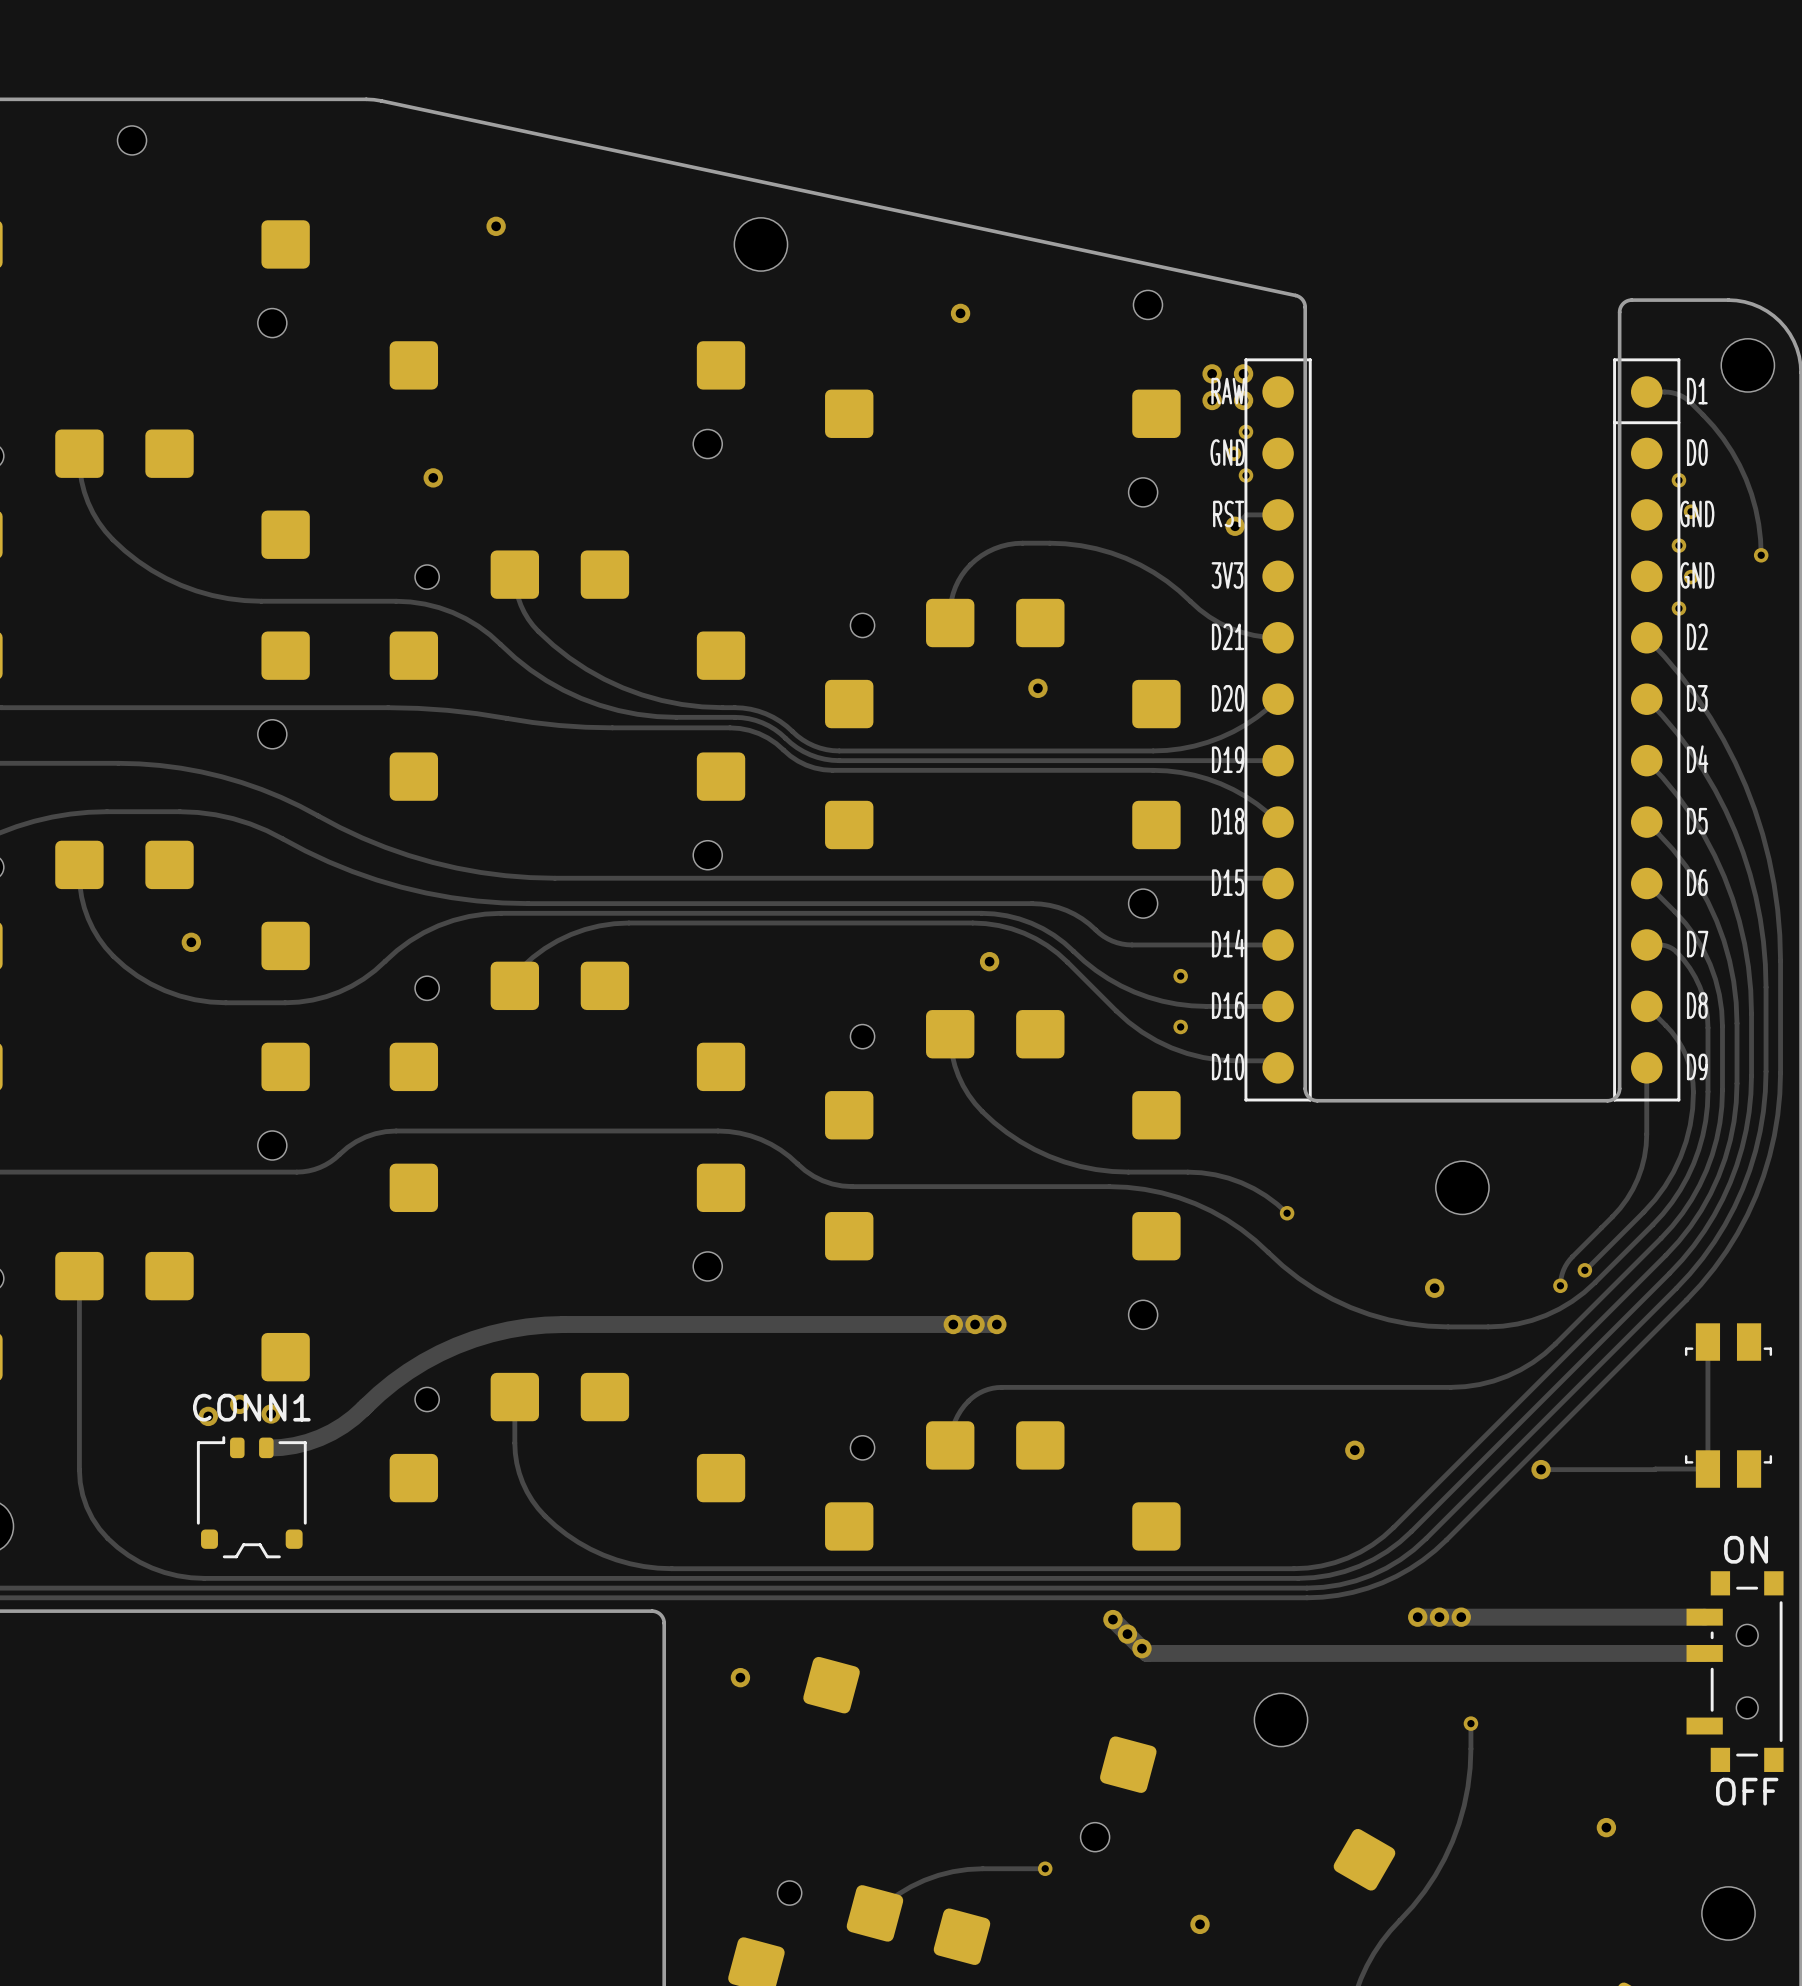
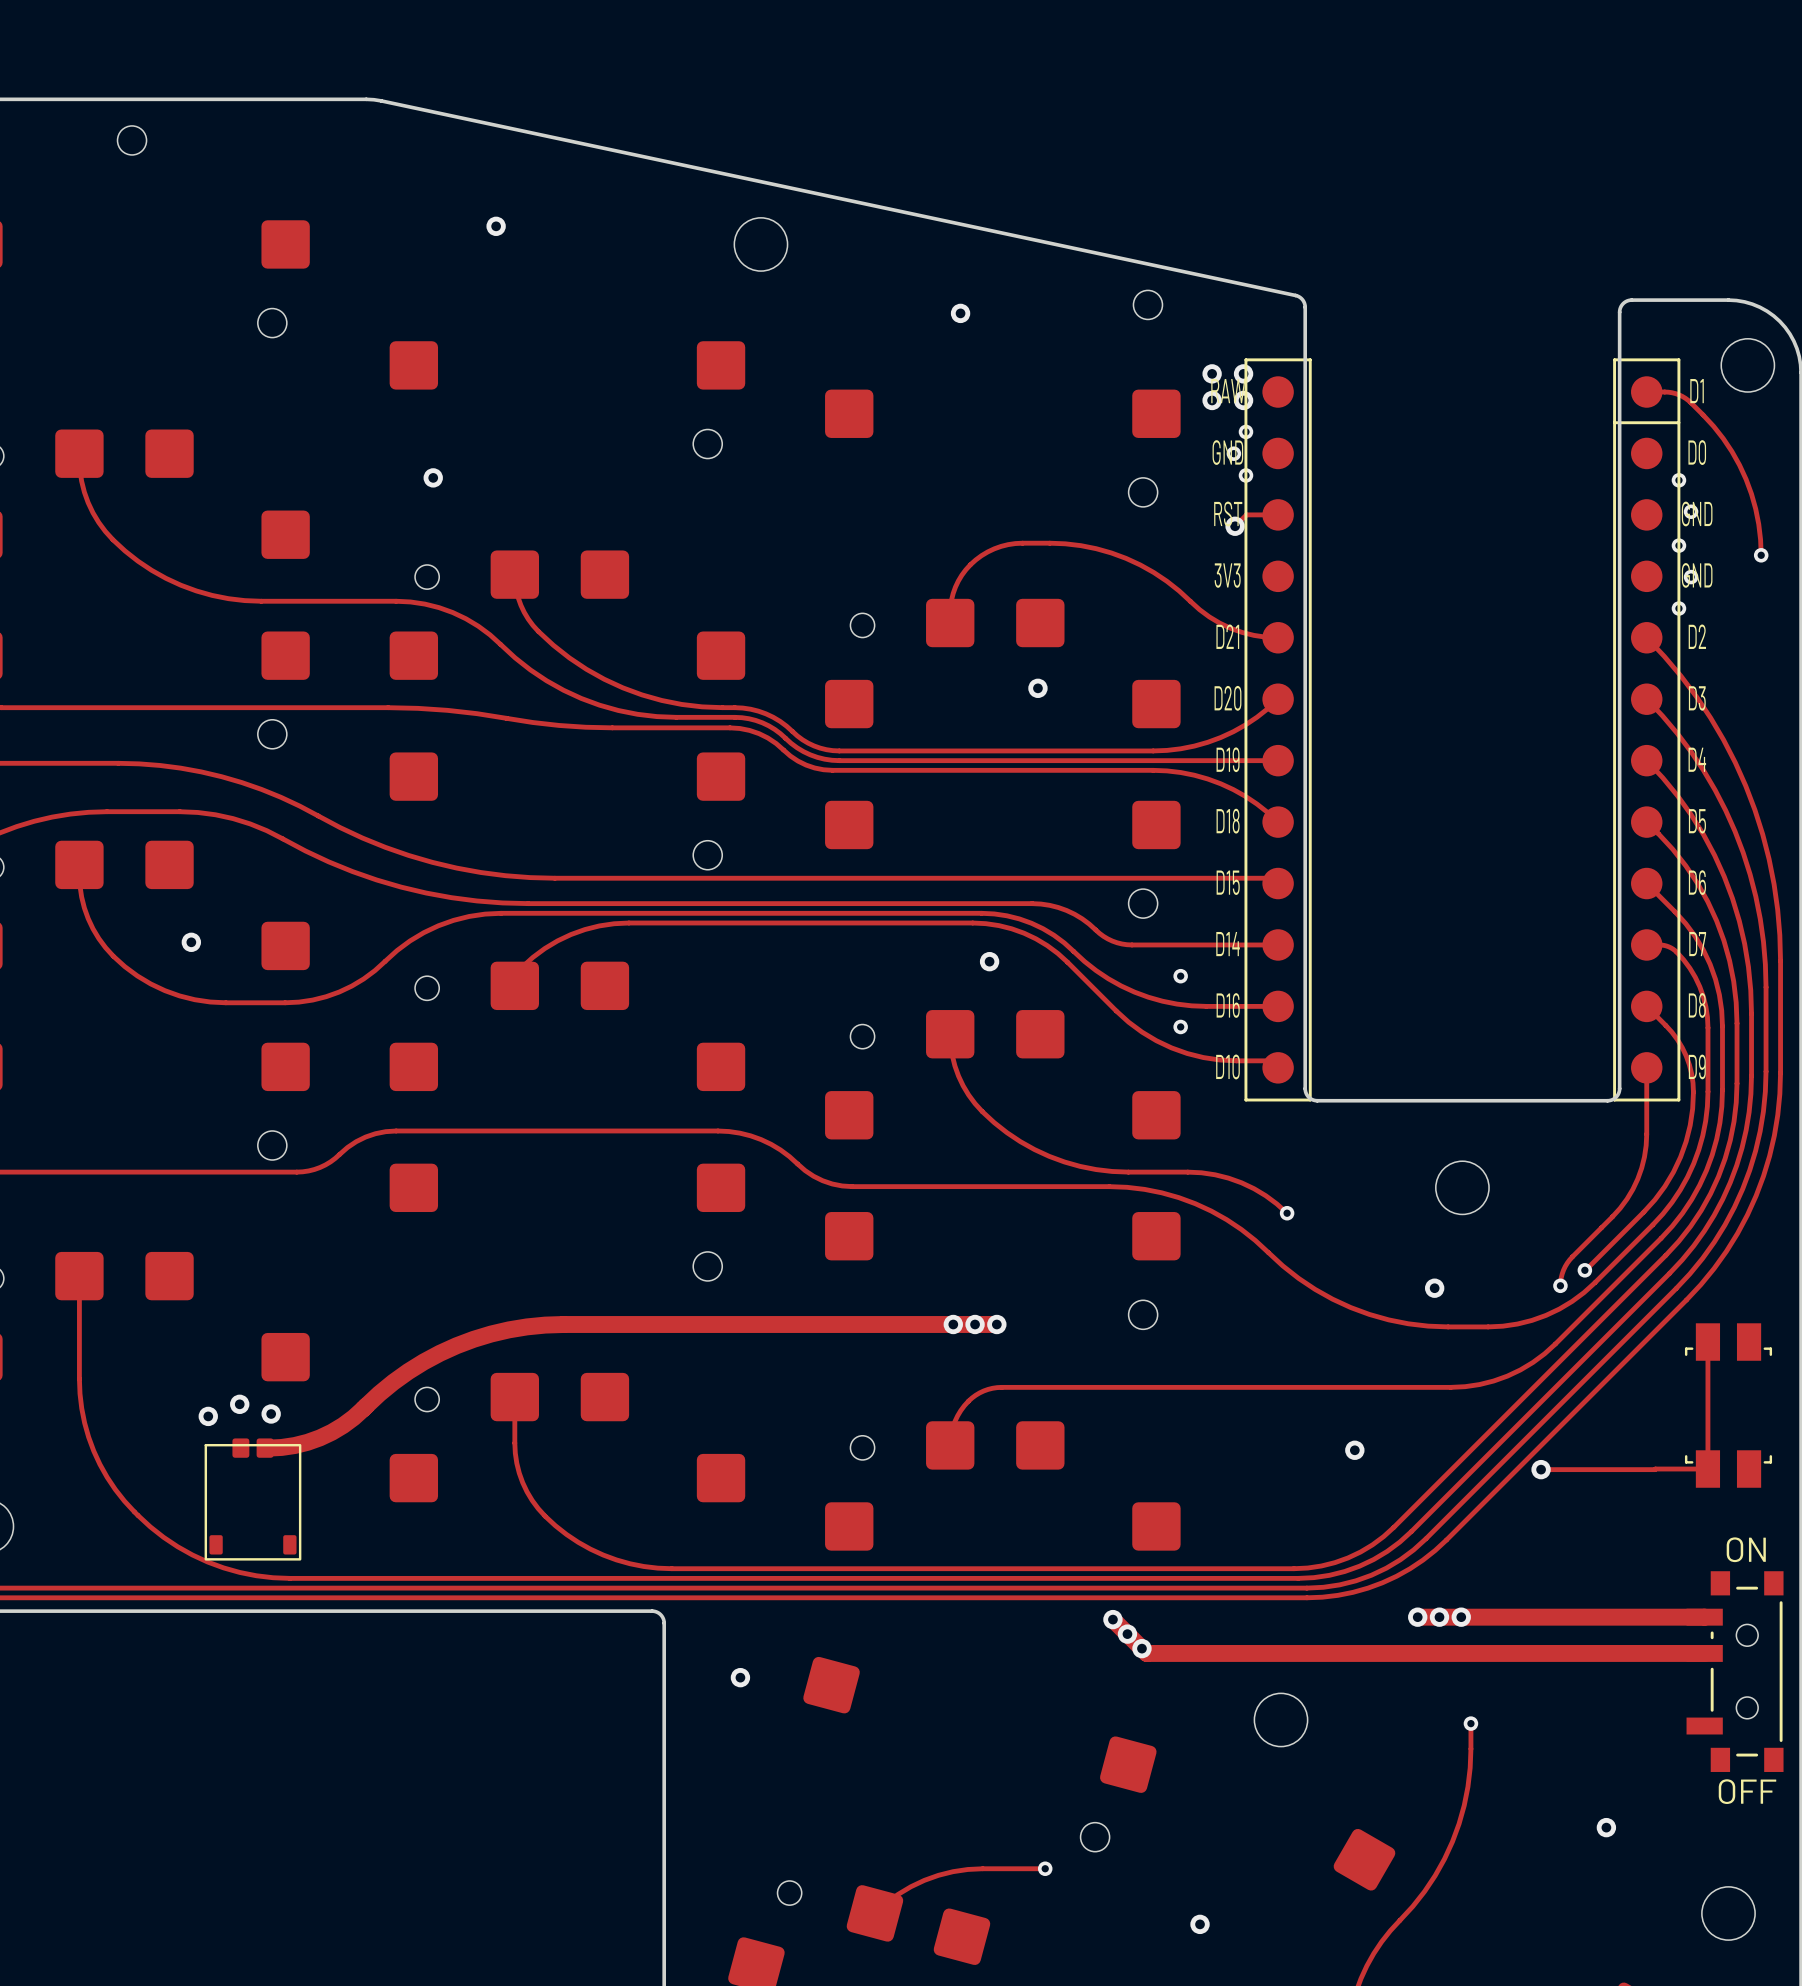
track: (79, 1379) (80, 1482) (86, 1507) (92, 1518) (107, 1538) (139, 1562) (177, 1575) (204, 1578) (290, 1578) -> (79, 1379) (81, 1408) (93, 1450) (115, 1489) (137, 1515) (163, 1537) (207, 1562) (256, 1575) (290, 1578)
CONN1: (251, 1497) -> none
part: none -> (252, 1499)

